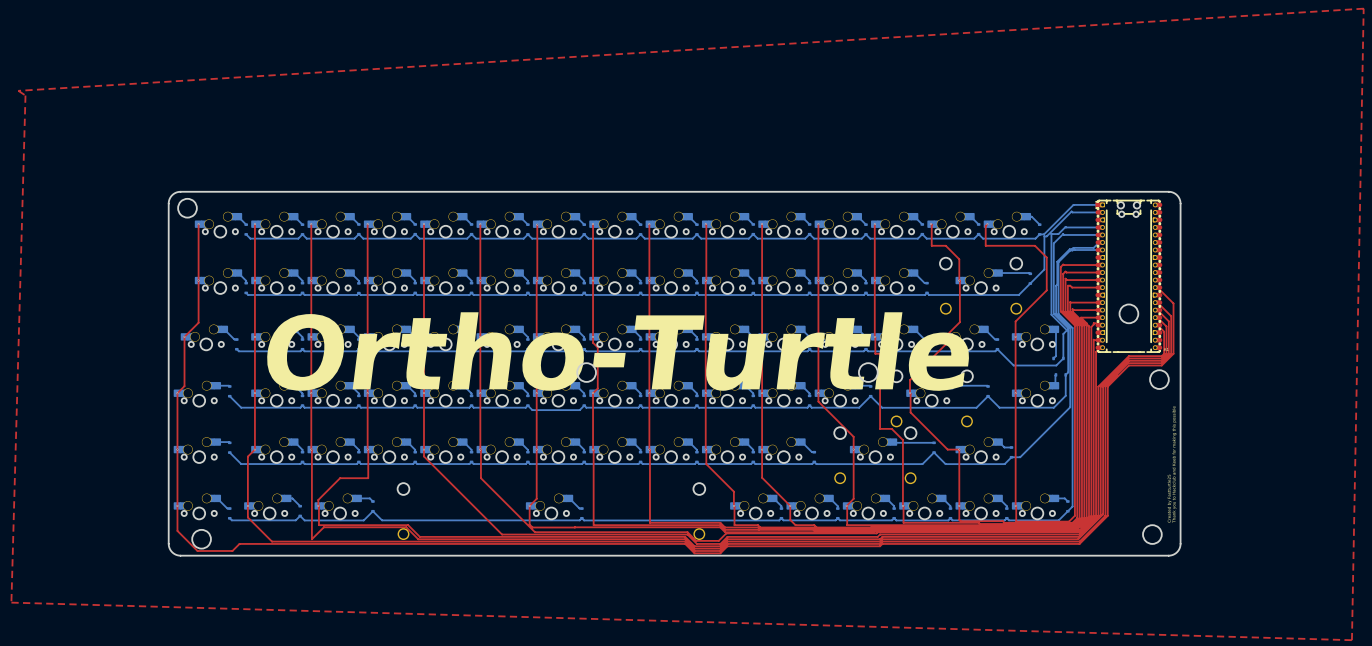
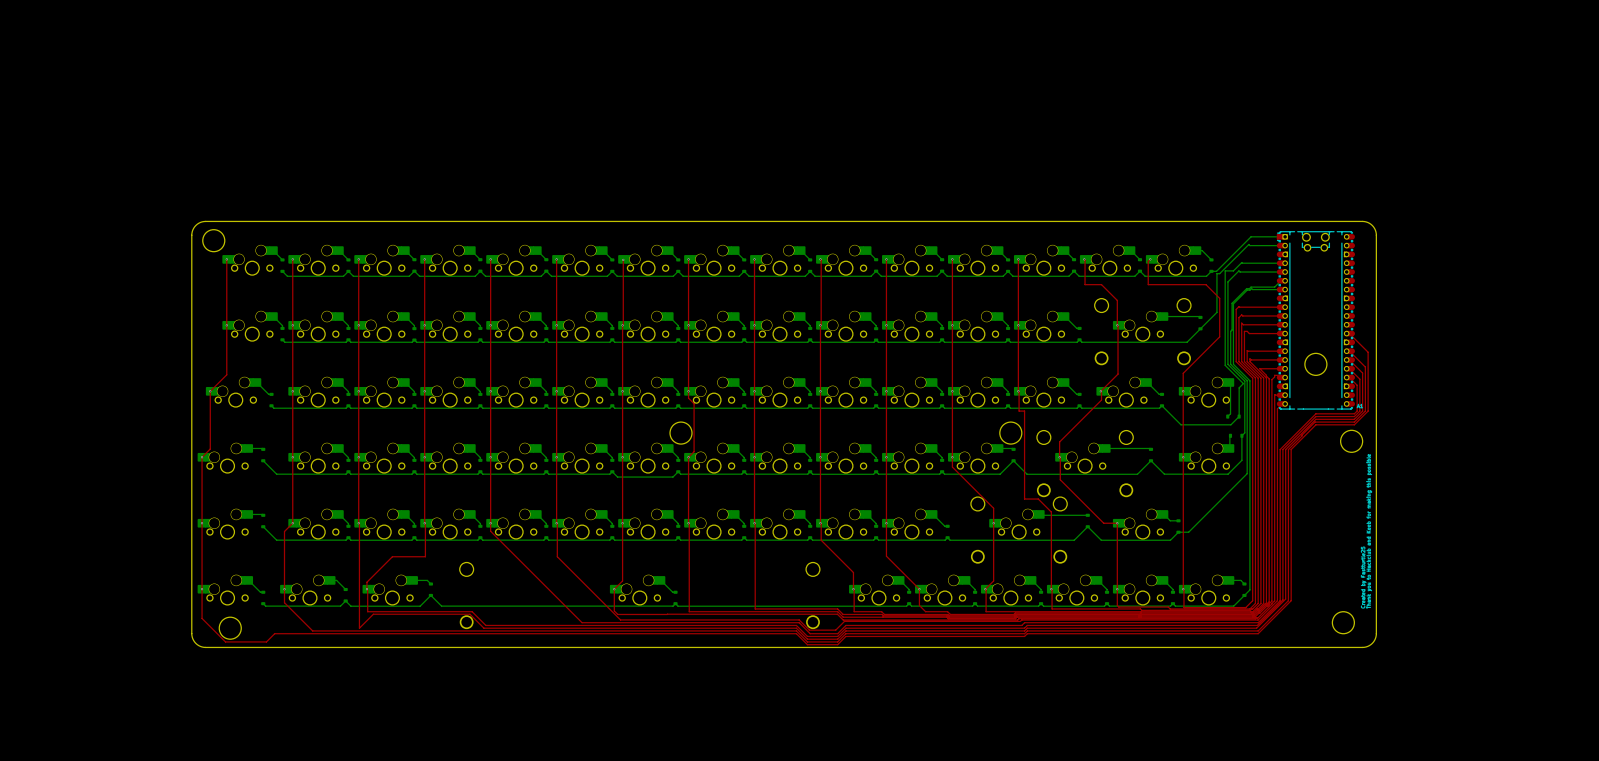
top zone outline: (1363, 8) (1351, 640) (11, 602) (25, 95) (18, 90) (1363, 8) -> none
text: Ortho-Turtle (617, 351) -> none

